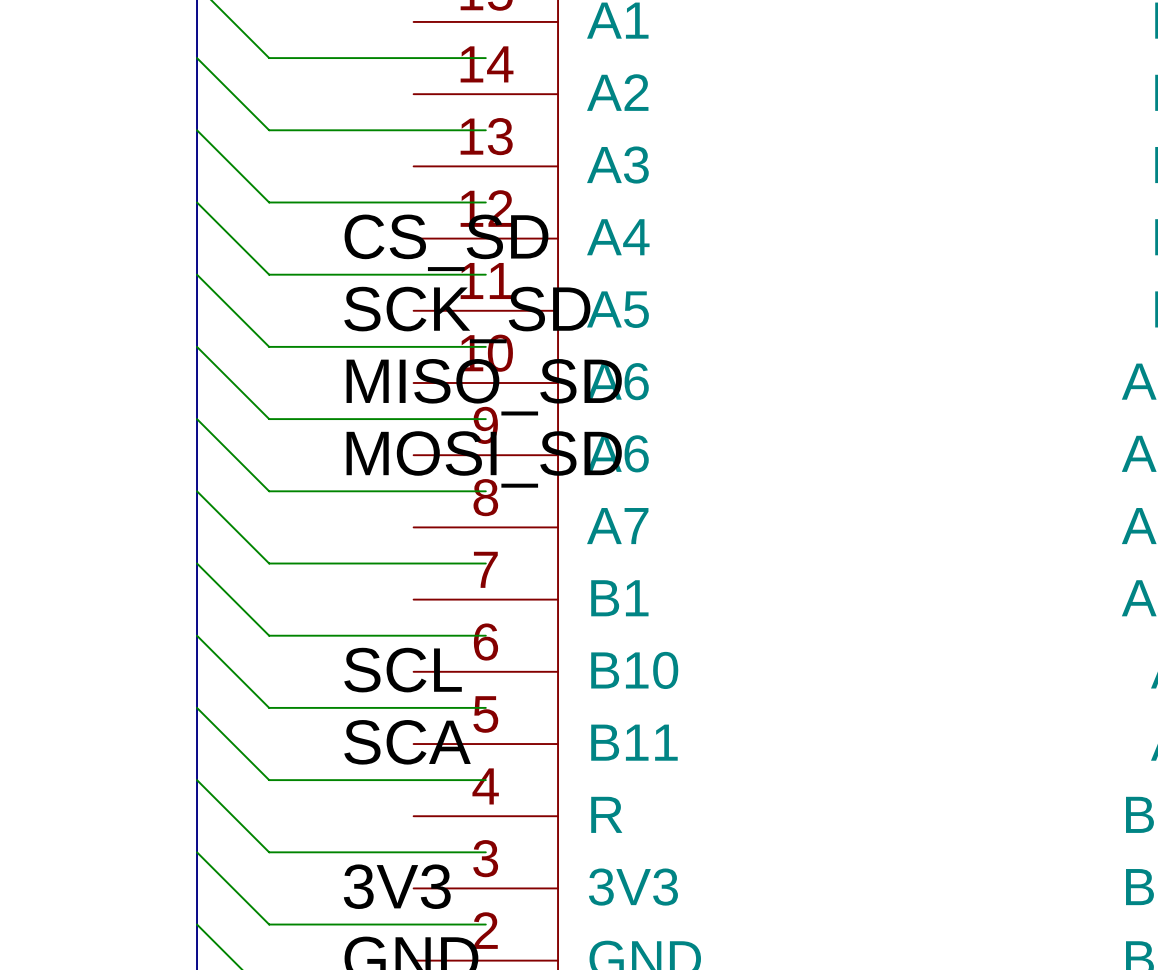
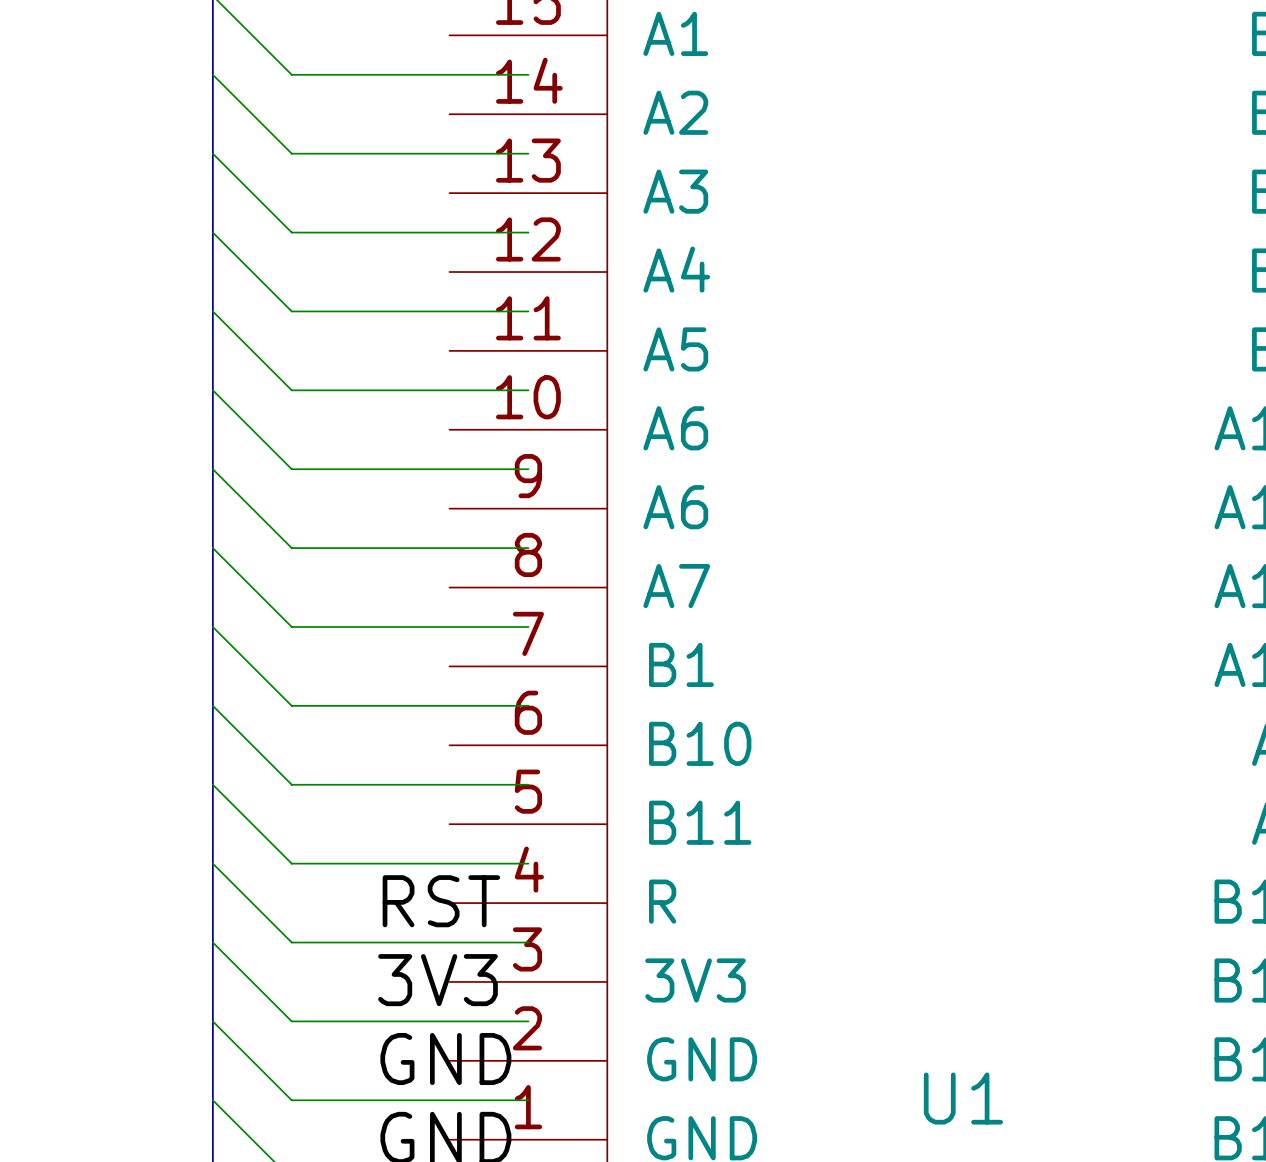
label: CS_SD (446, 242) -> none
label: SCK_SD (467, 315) -> none
label: MISO_SD (484, 387) -> none
label: MOSI_SD (484, 459) -> none
label: SCL (403, 670) -> none
label: SCA (407, 742) -> none
label: none -> RST (441, 901)

